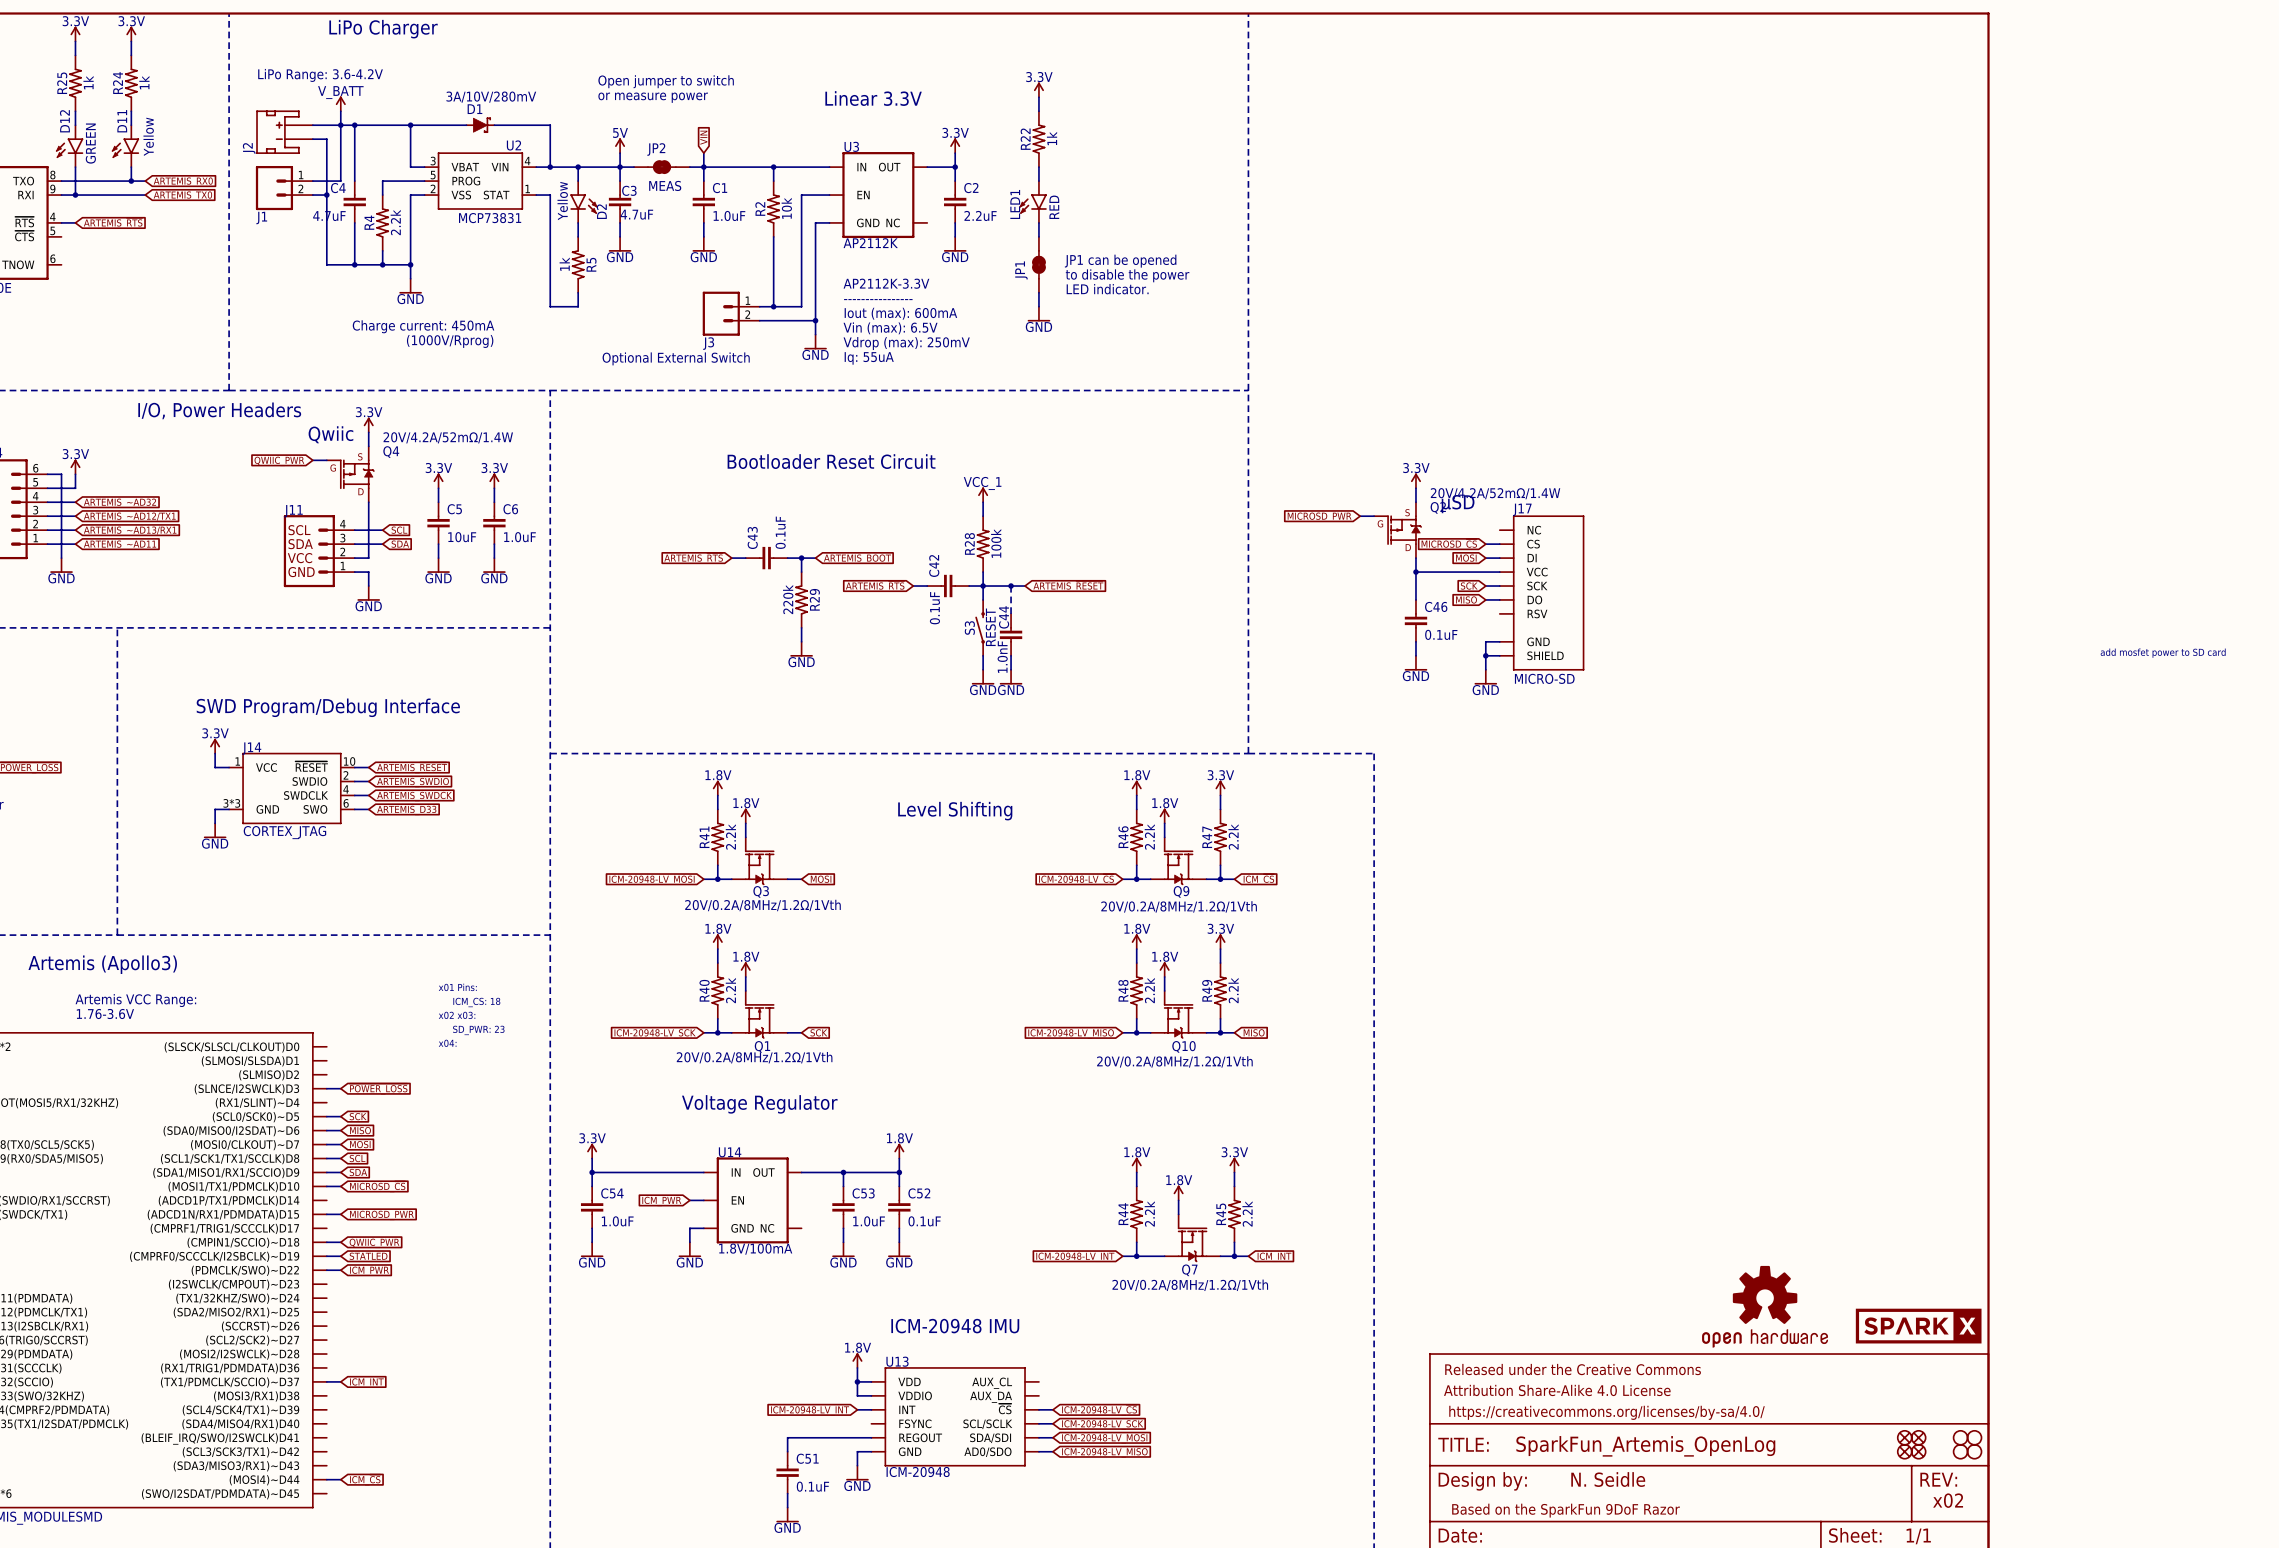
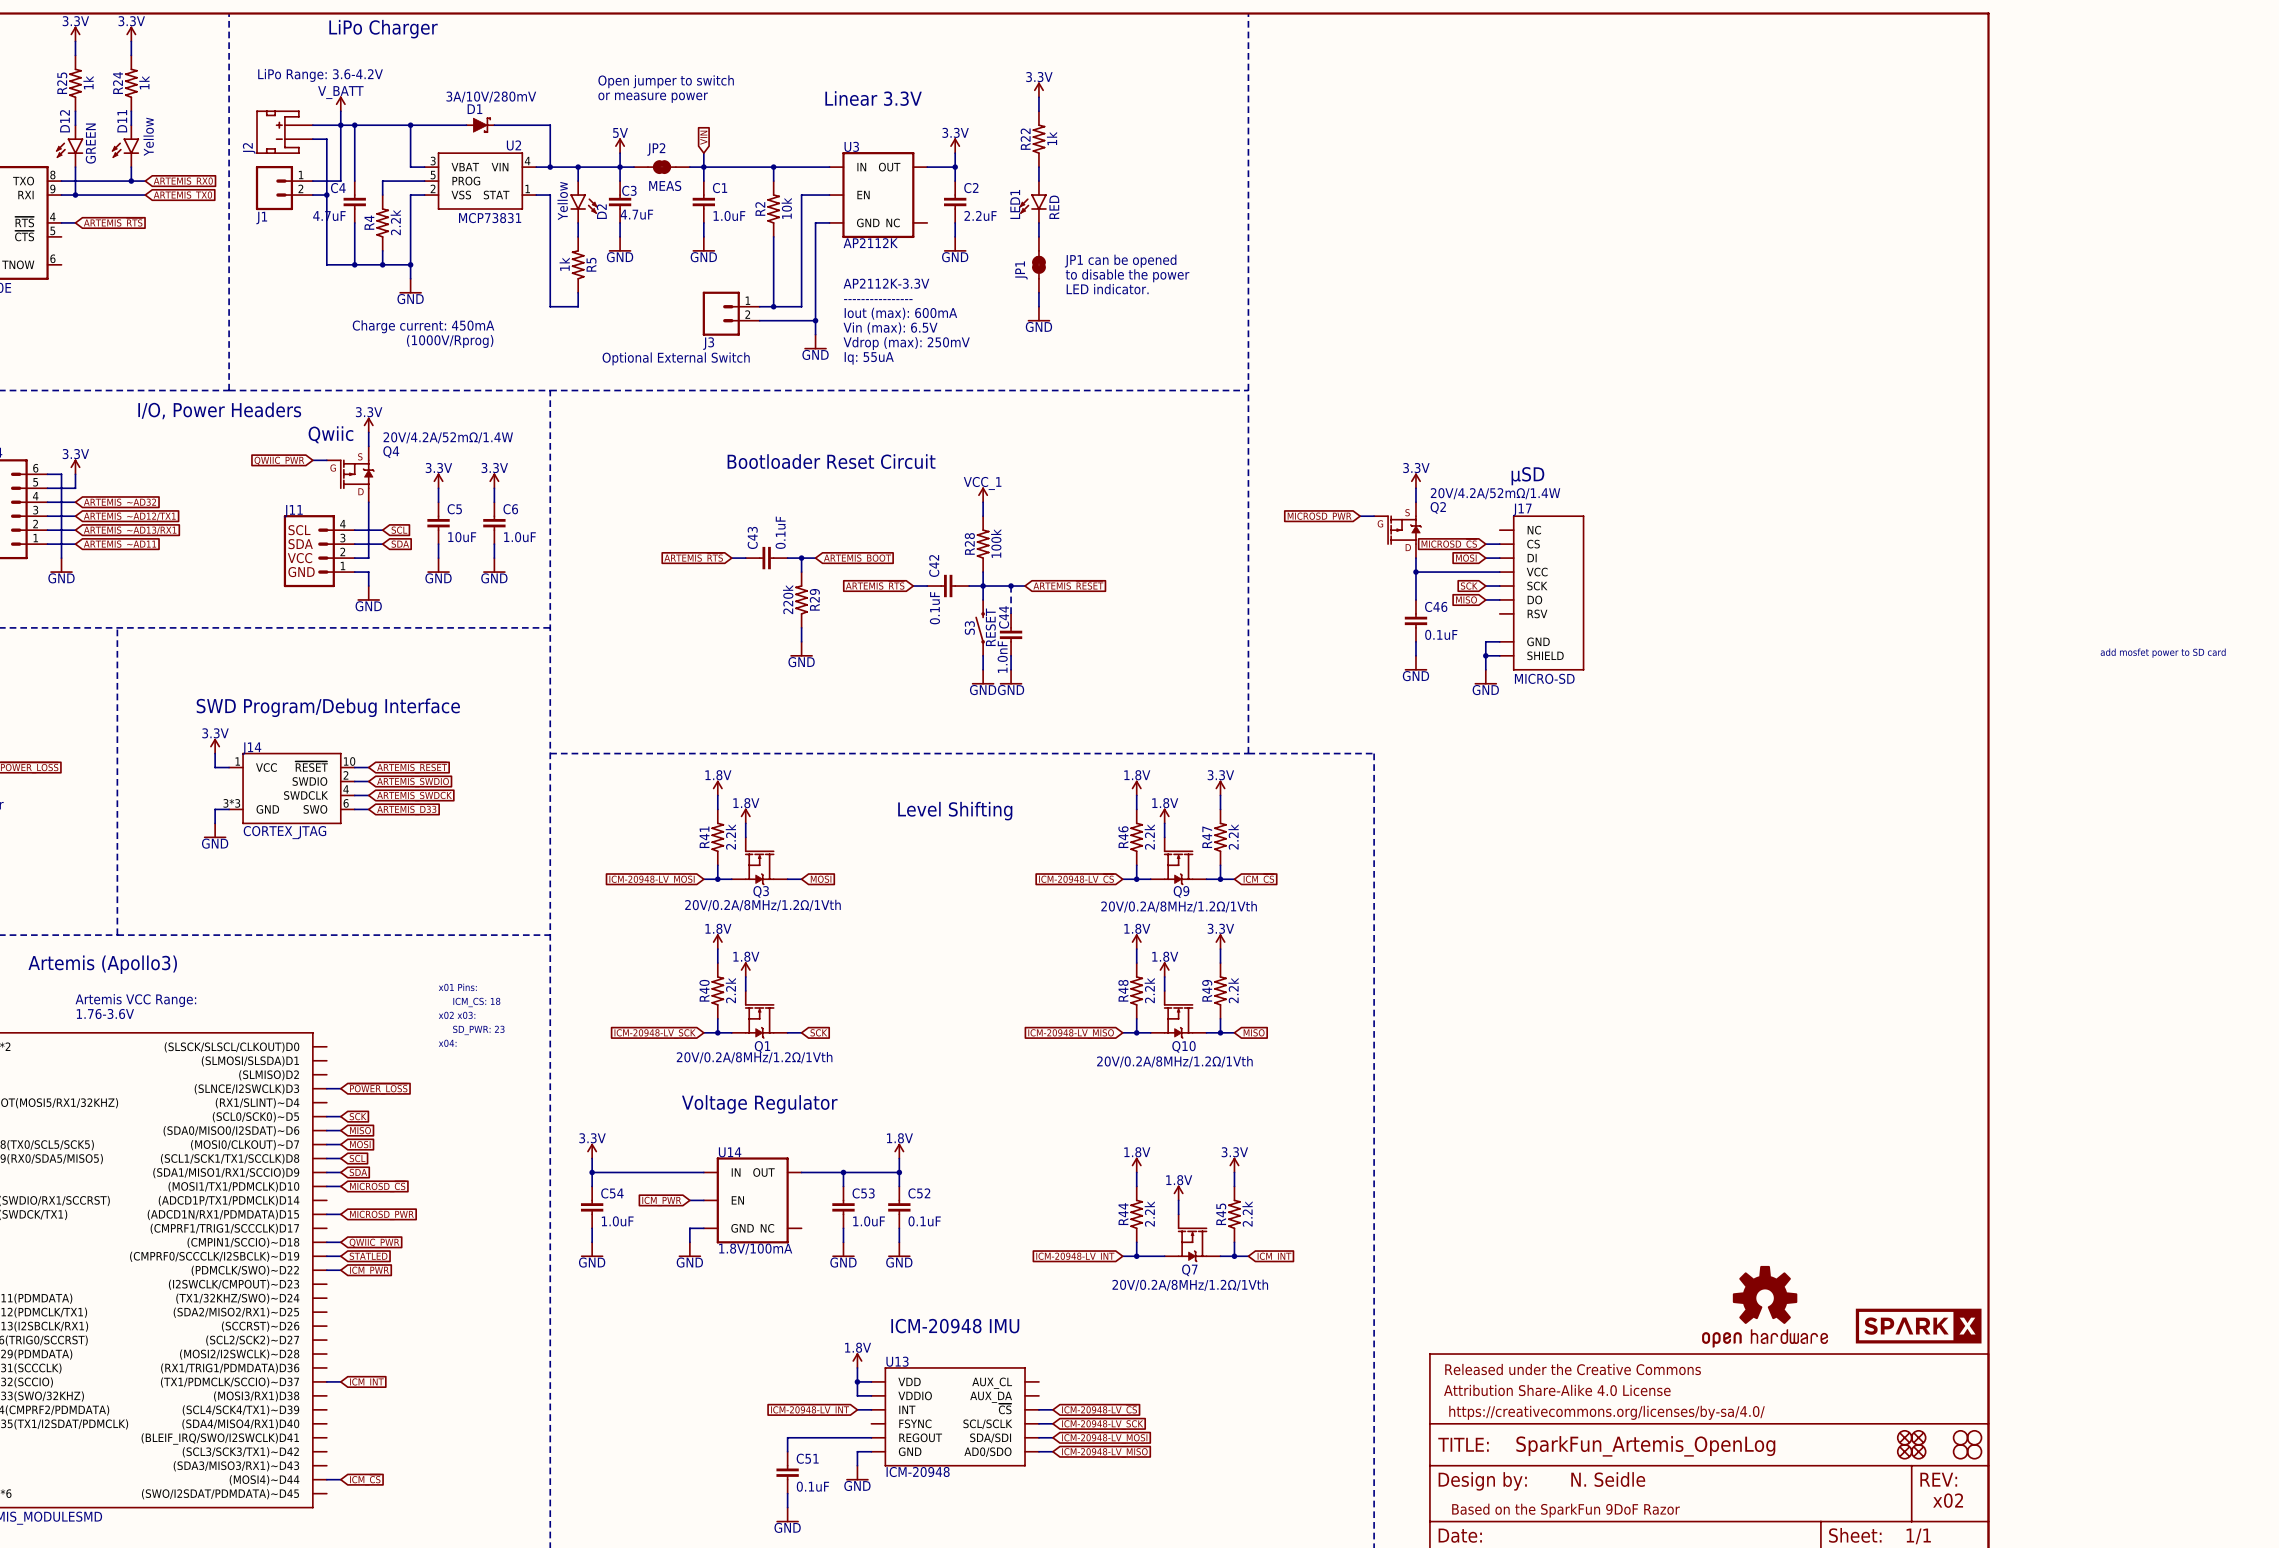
text position: μSD (1458, 504) -> μSD (1527, 476)

